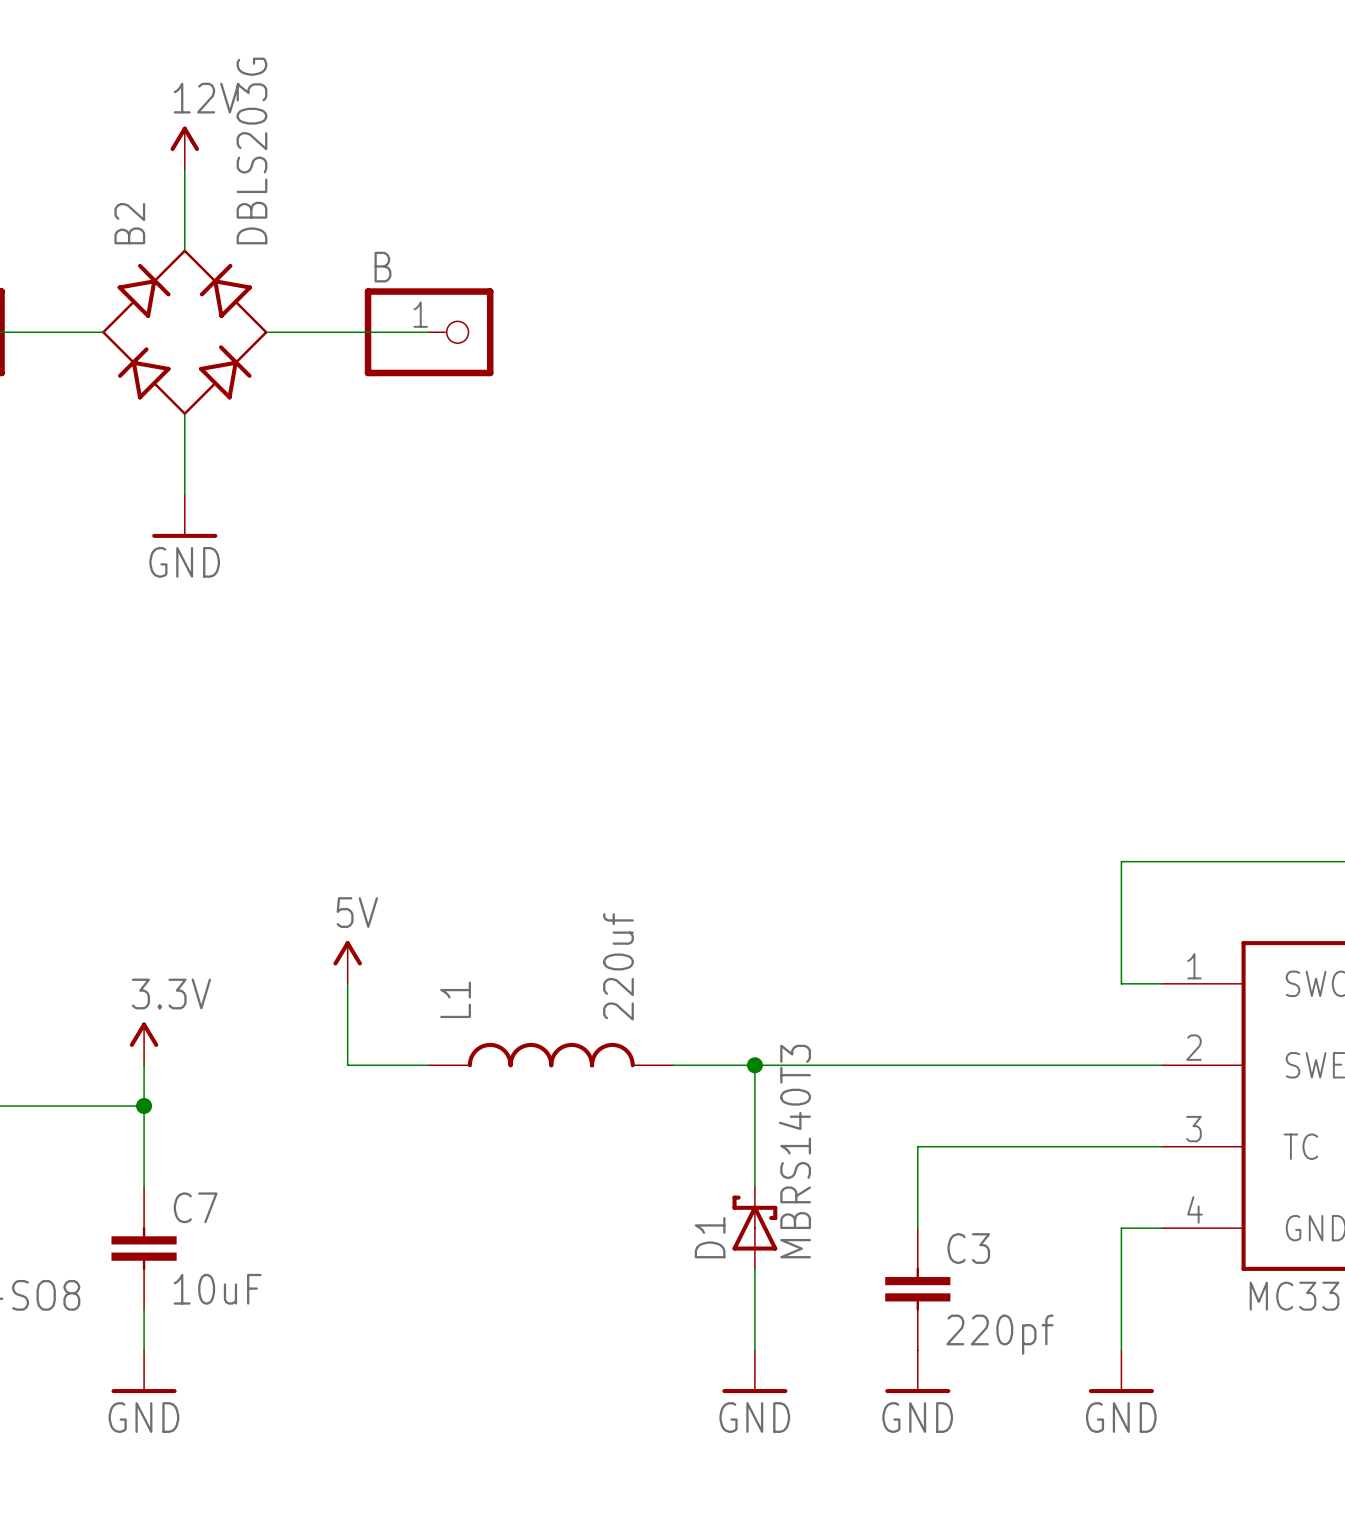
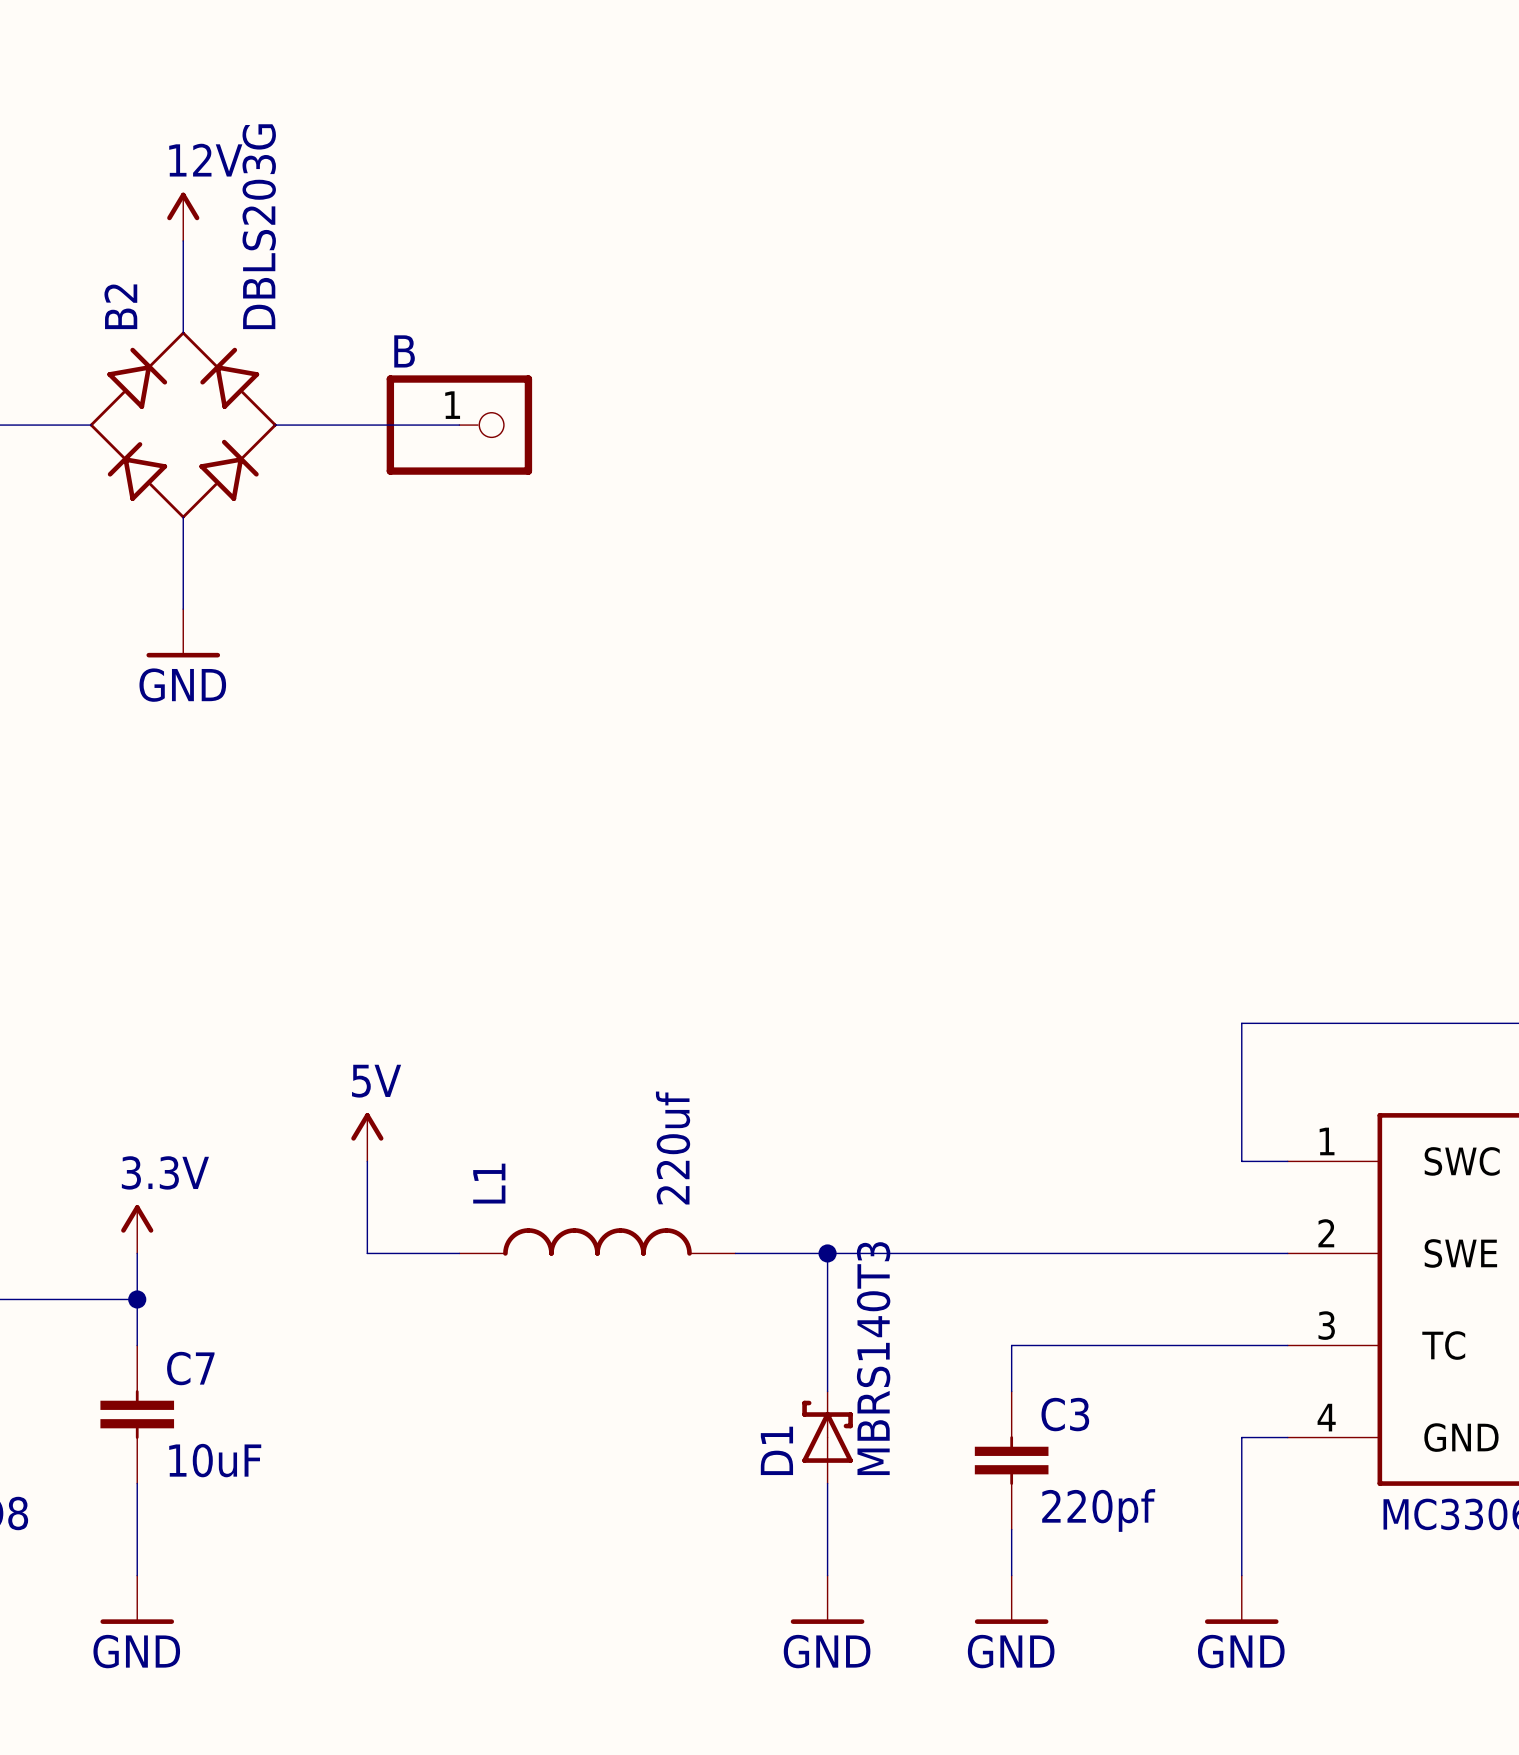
C7 position: (144, 1248) -> (137, 1414)
C3 position: (917, 1289) -> (1011, 1460)

